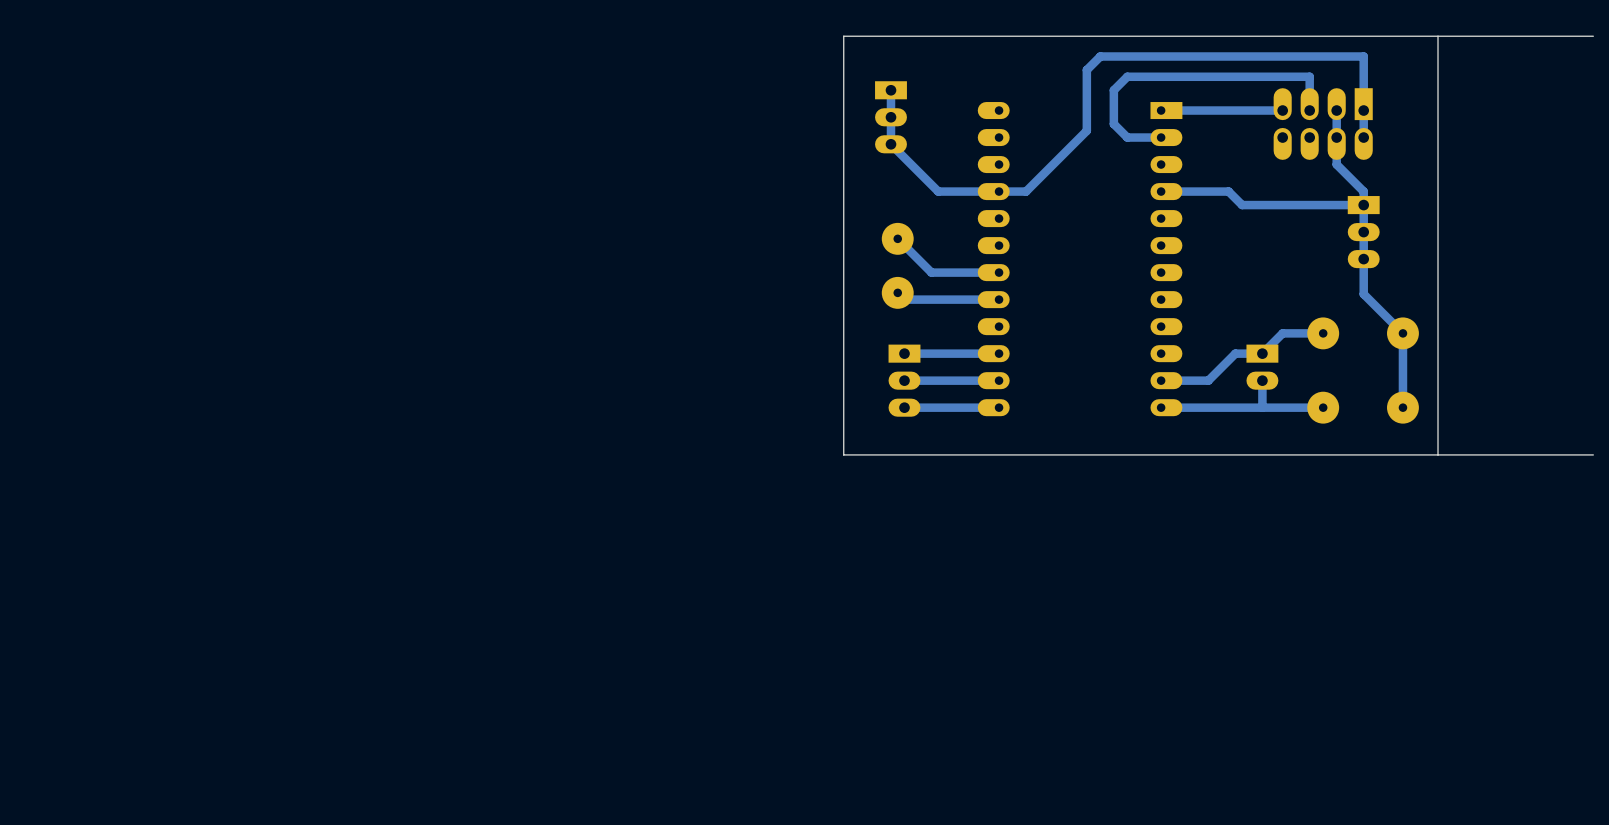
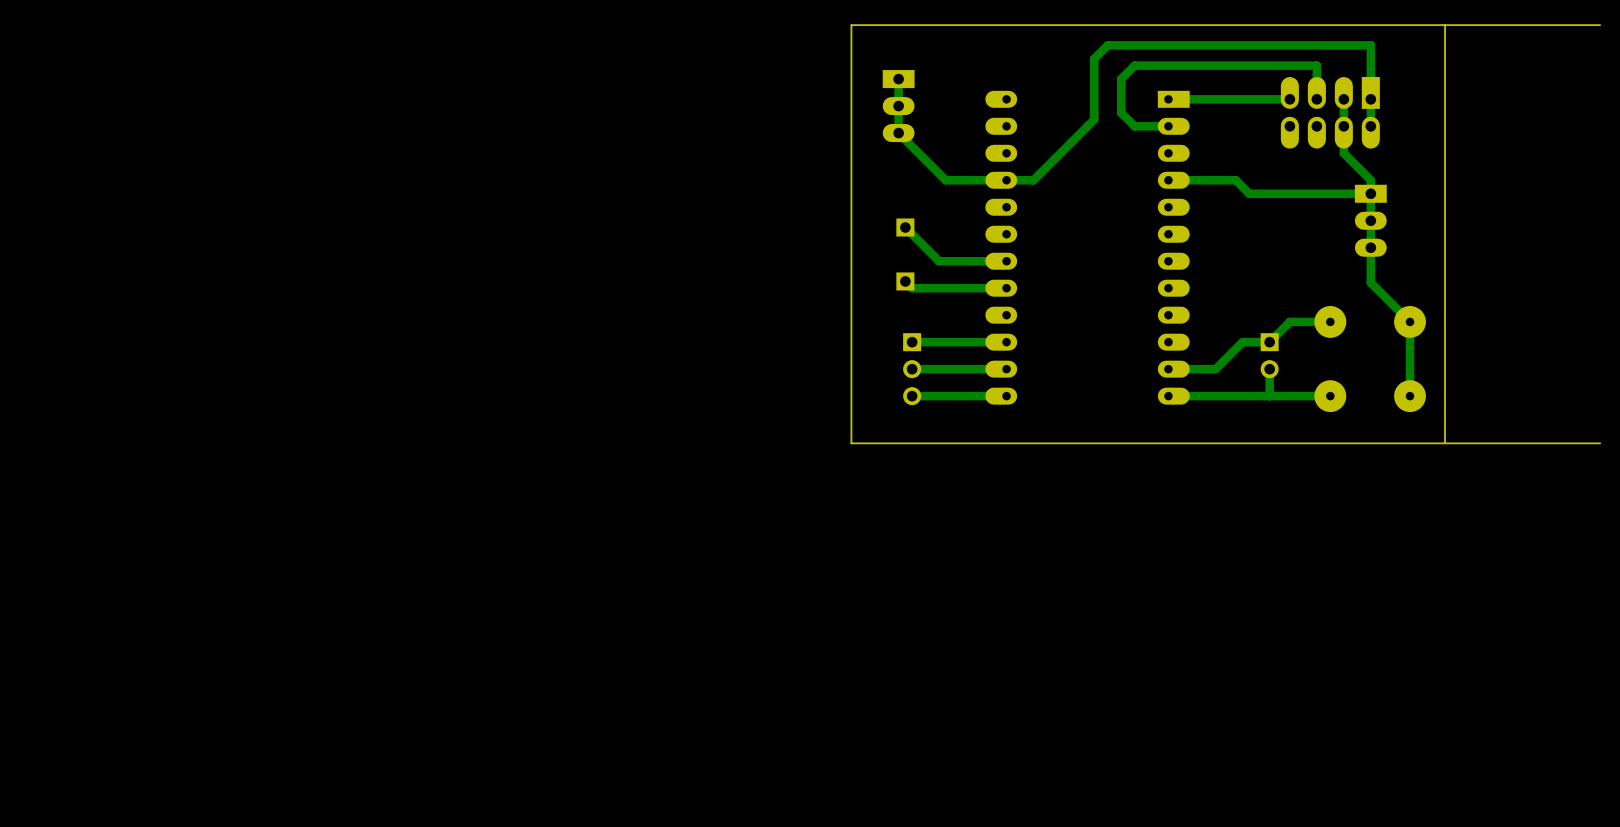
part footprint: [881, 222, 914, 255] -> [896, 218, 915, 237]
part footprint: [881, 276, 914, 309] -> [896, 272, 915, 291]
part footprint: [888, 344, 921, 417] -> [903, 333, 922, 406]
part footprint: [1246, 344, 1279, 390] -> [1260, 333, 1279, 379]

